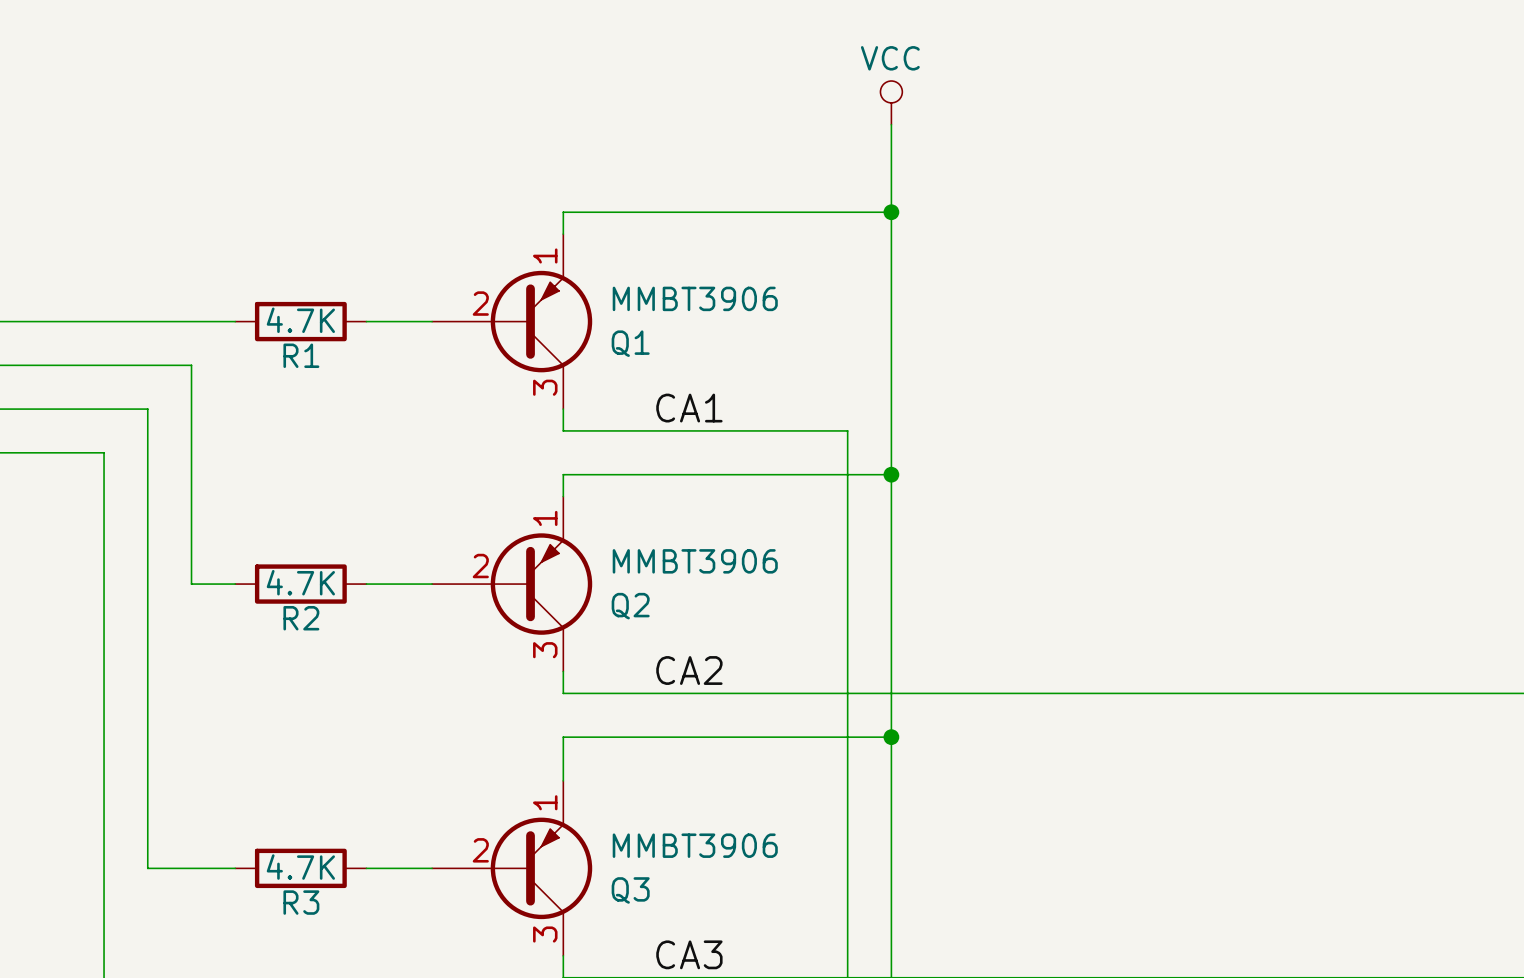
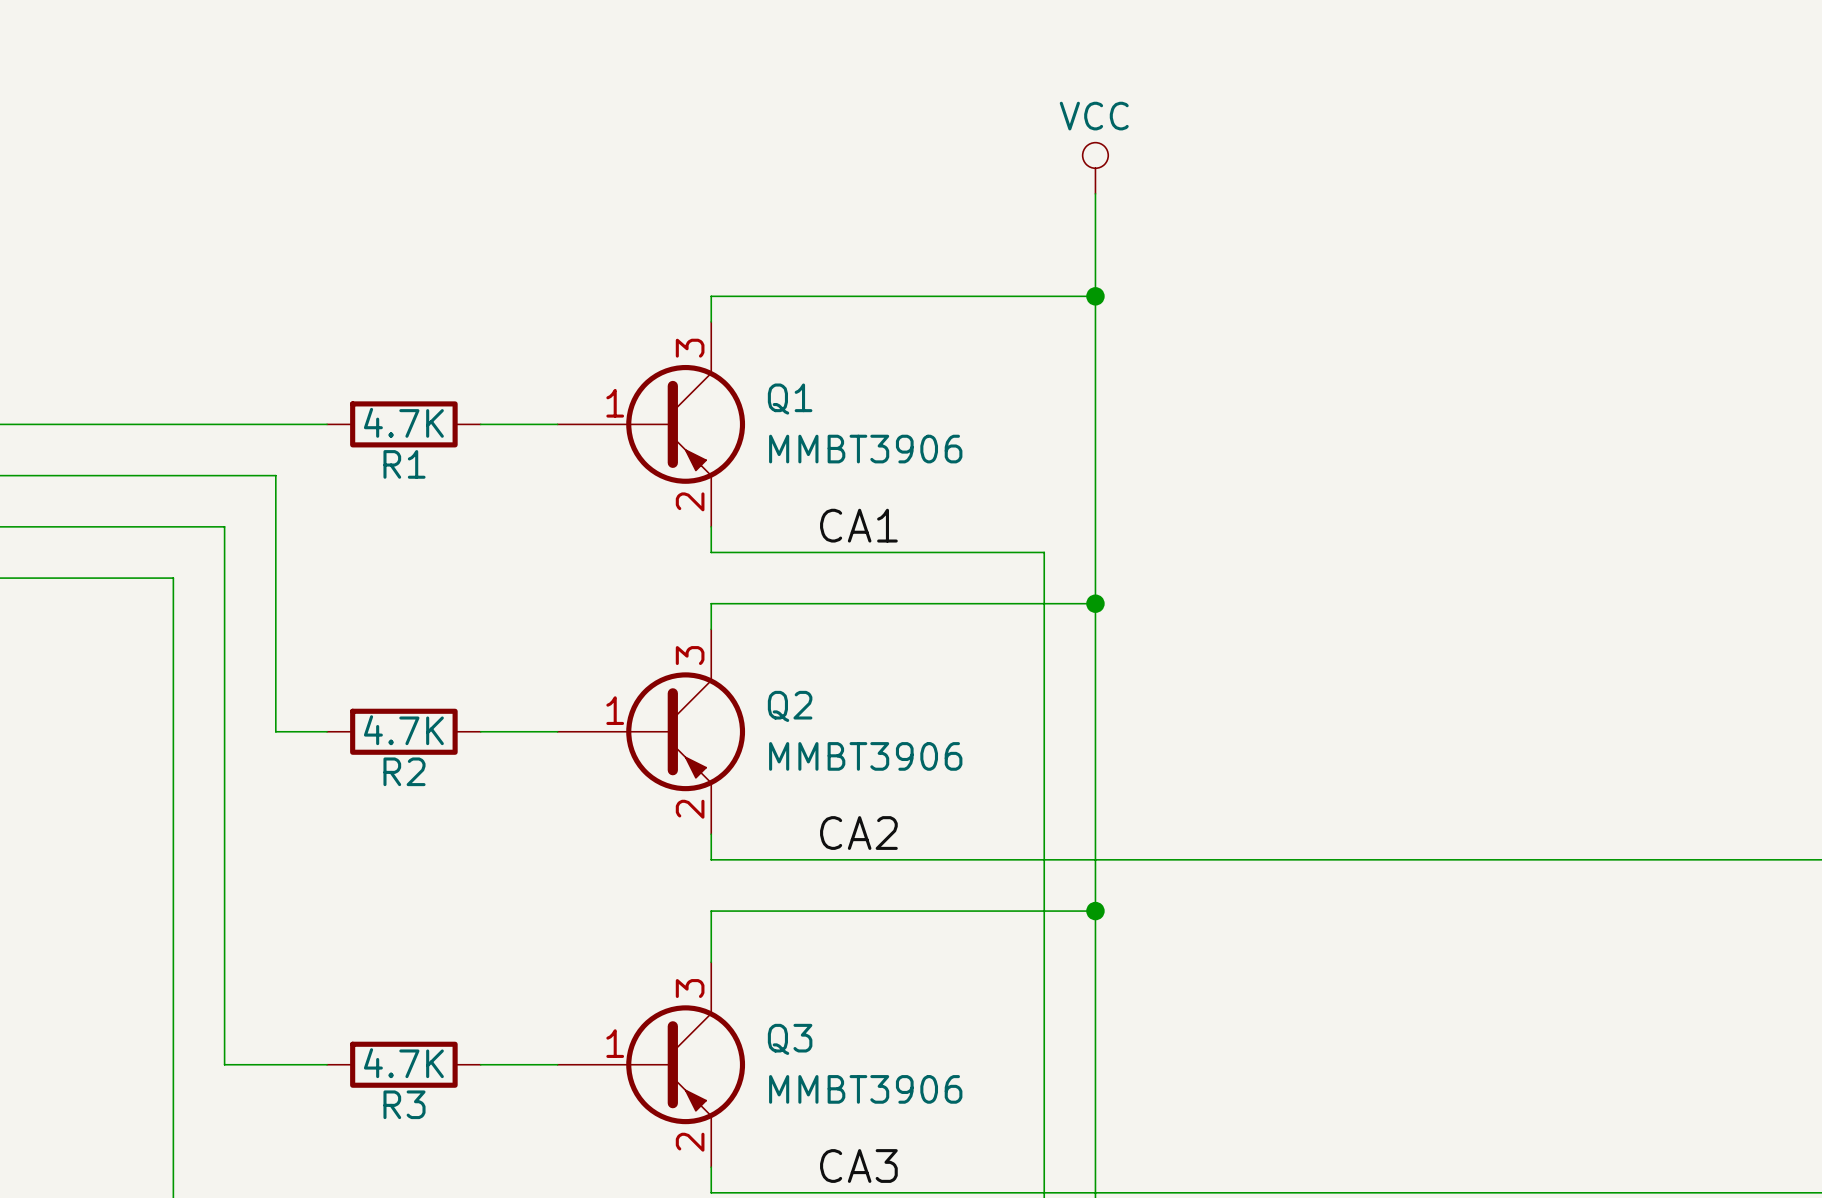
Q1 symbol: [432, 234, 593, 410] -> [557, 321, 746, 527]
Q1 value position: MMBT3906 (695, 298) -> MMBT3906 (865, 449)
Q1 name position: Q1 (630, 343) -> Q1 (790, 399)
Q2 symbol: [432, 496, 593, 672] -> [557, 629, 746, 835]
Q2 value position: MMBT3906 (695, 561) -> MMBT3906 (865, 756)
Q2 name position: Q2 (630, 606) -> Q2 (790, 706)
Q3 symbol: [432, 780, 593, 956] -> [557, 962, 746, 1168]
Q3 value position: MMBT3906 (695, 845) -> MMBT3906 (865, 1089)
Q3 name position: Q3 (630, 890) -> Q3 (790, 1039)

